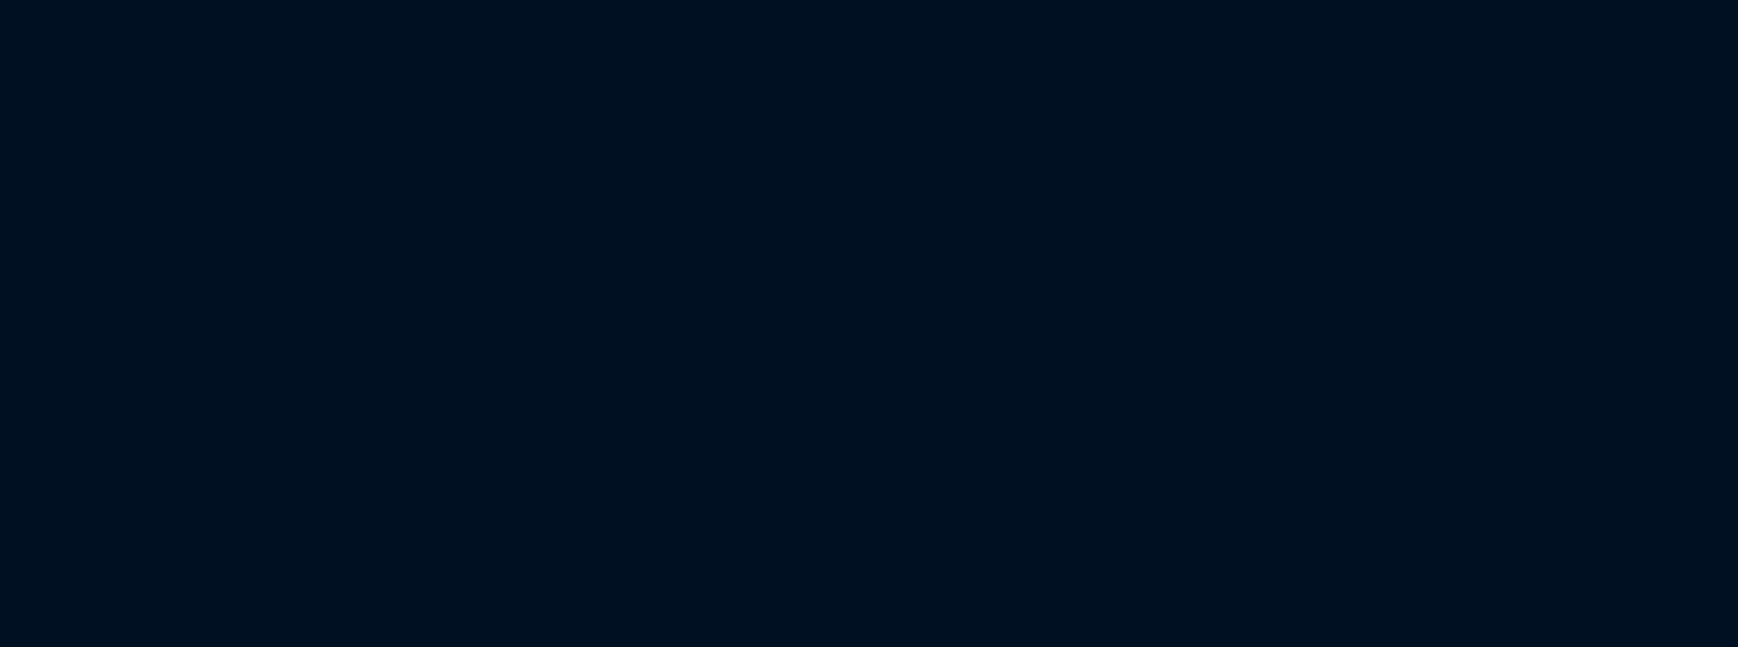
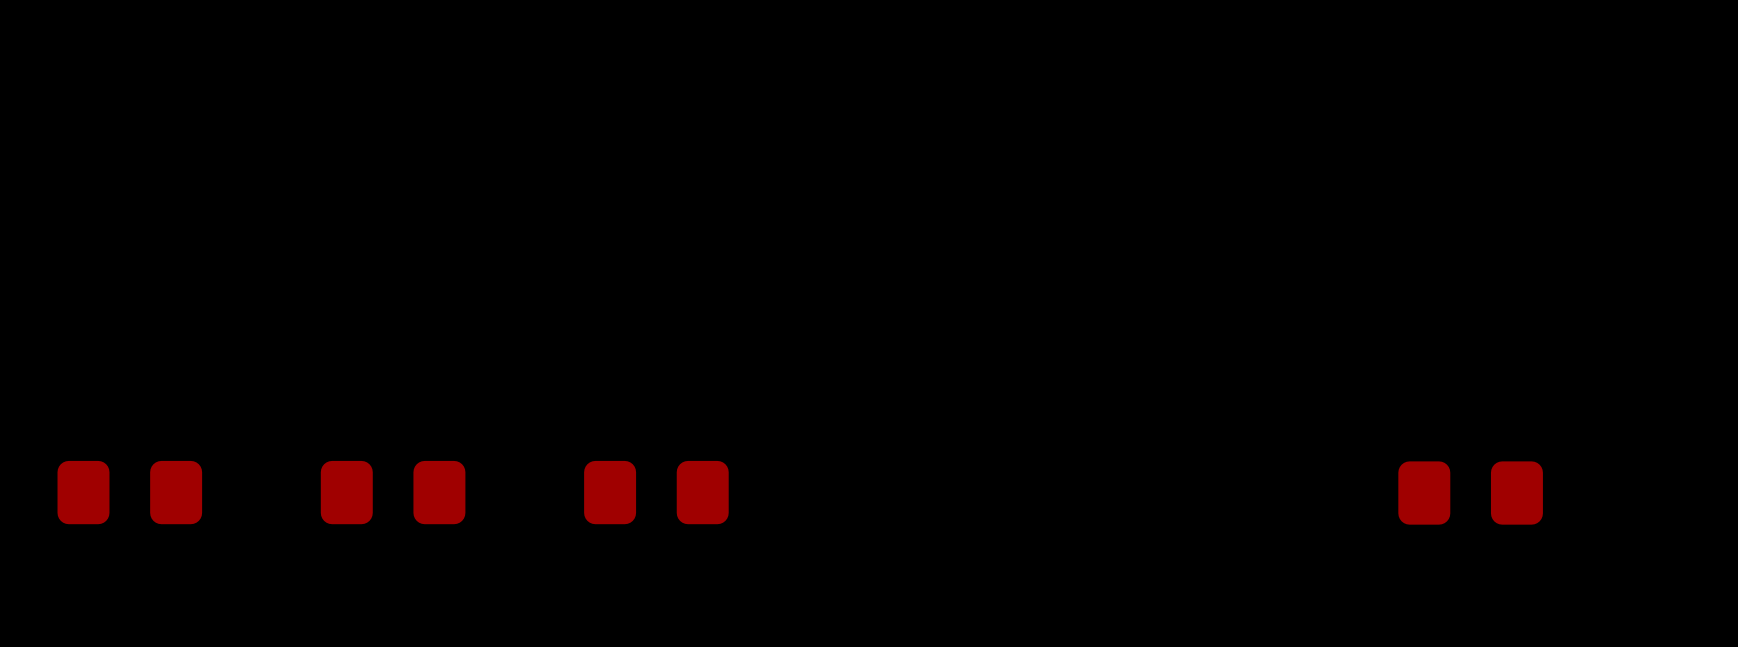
part: none -> (129, 492)
part: none -> (393, 492)
part: none -> (656, 492)
part: none -> (1470, 493)

